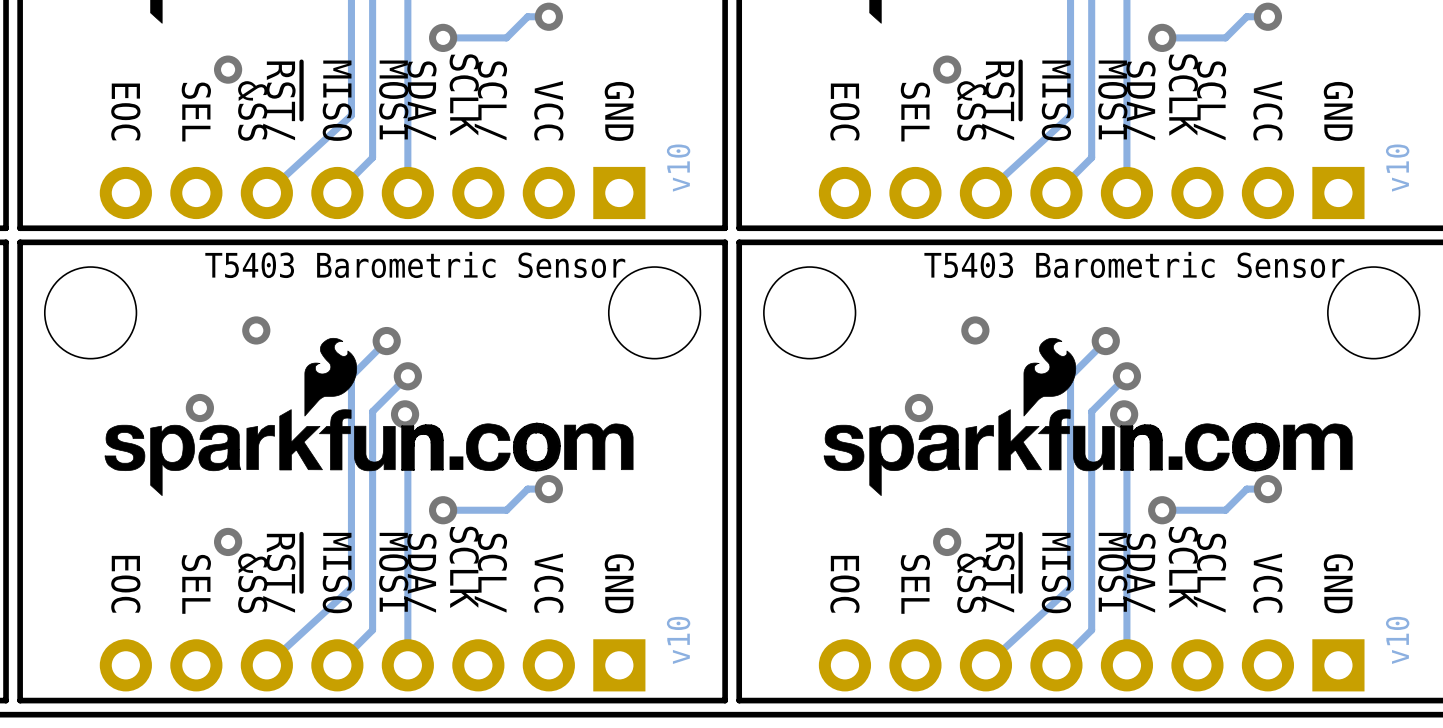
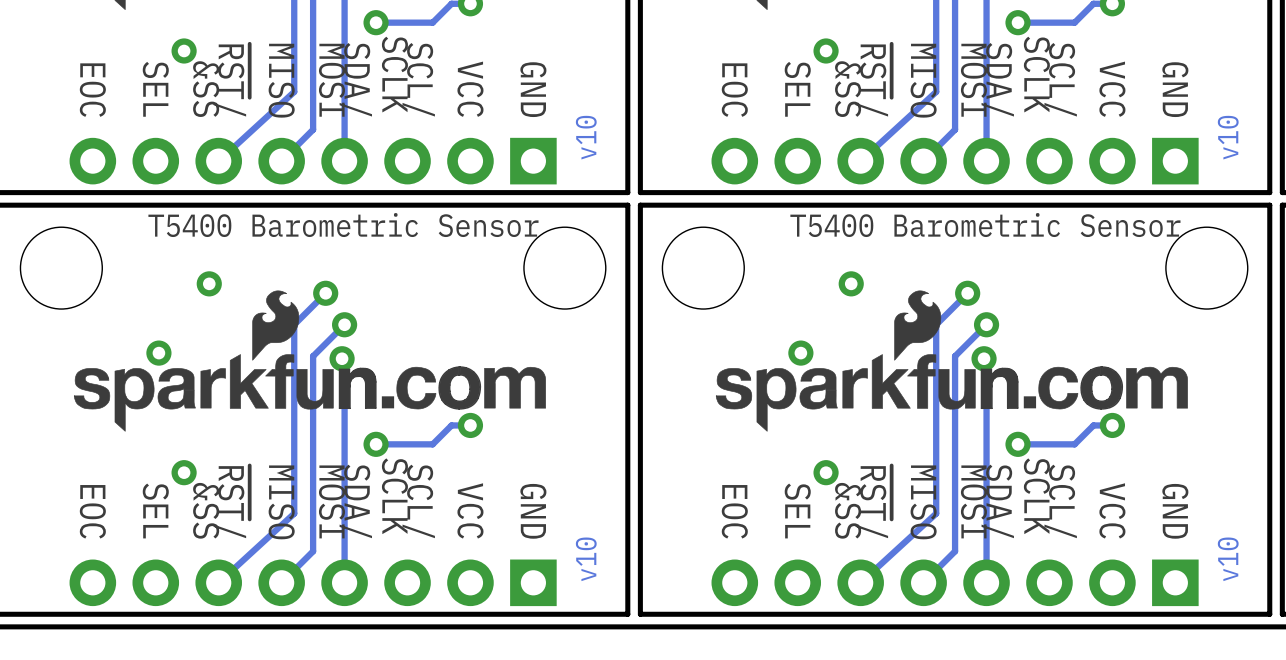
text: T5403 Barometric Sensor (415, 264) -> T5400 Barometric Sensor (343, 225)
text: T5403 Barometric Sensor (1134, 264) -> T5400 Barometric Sensor (985, 225)

